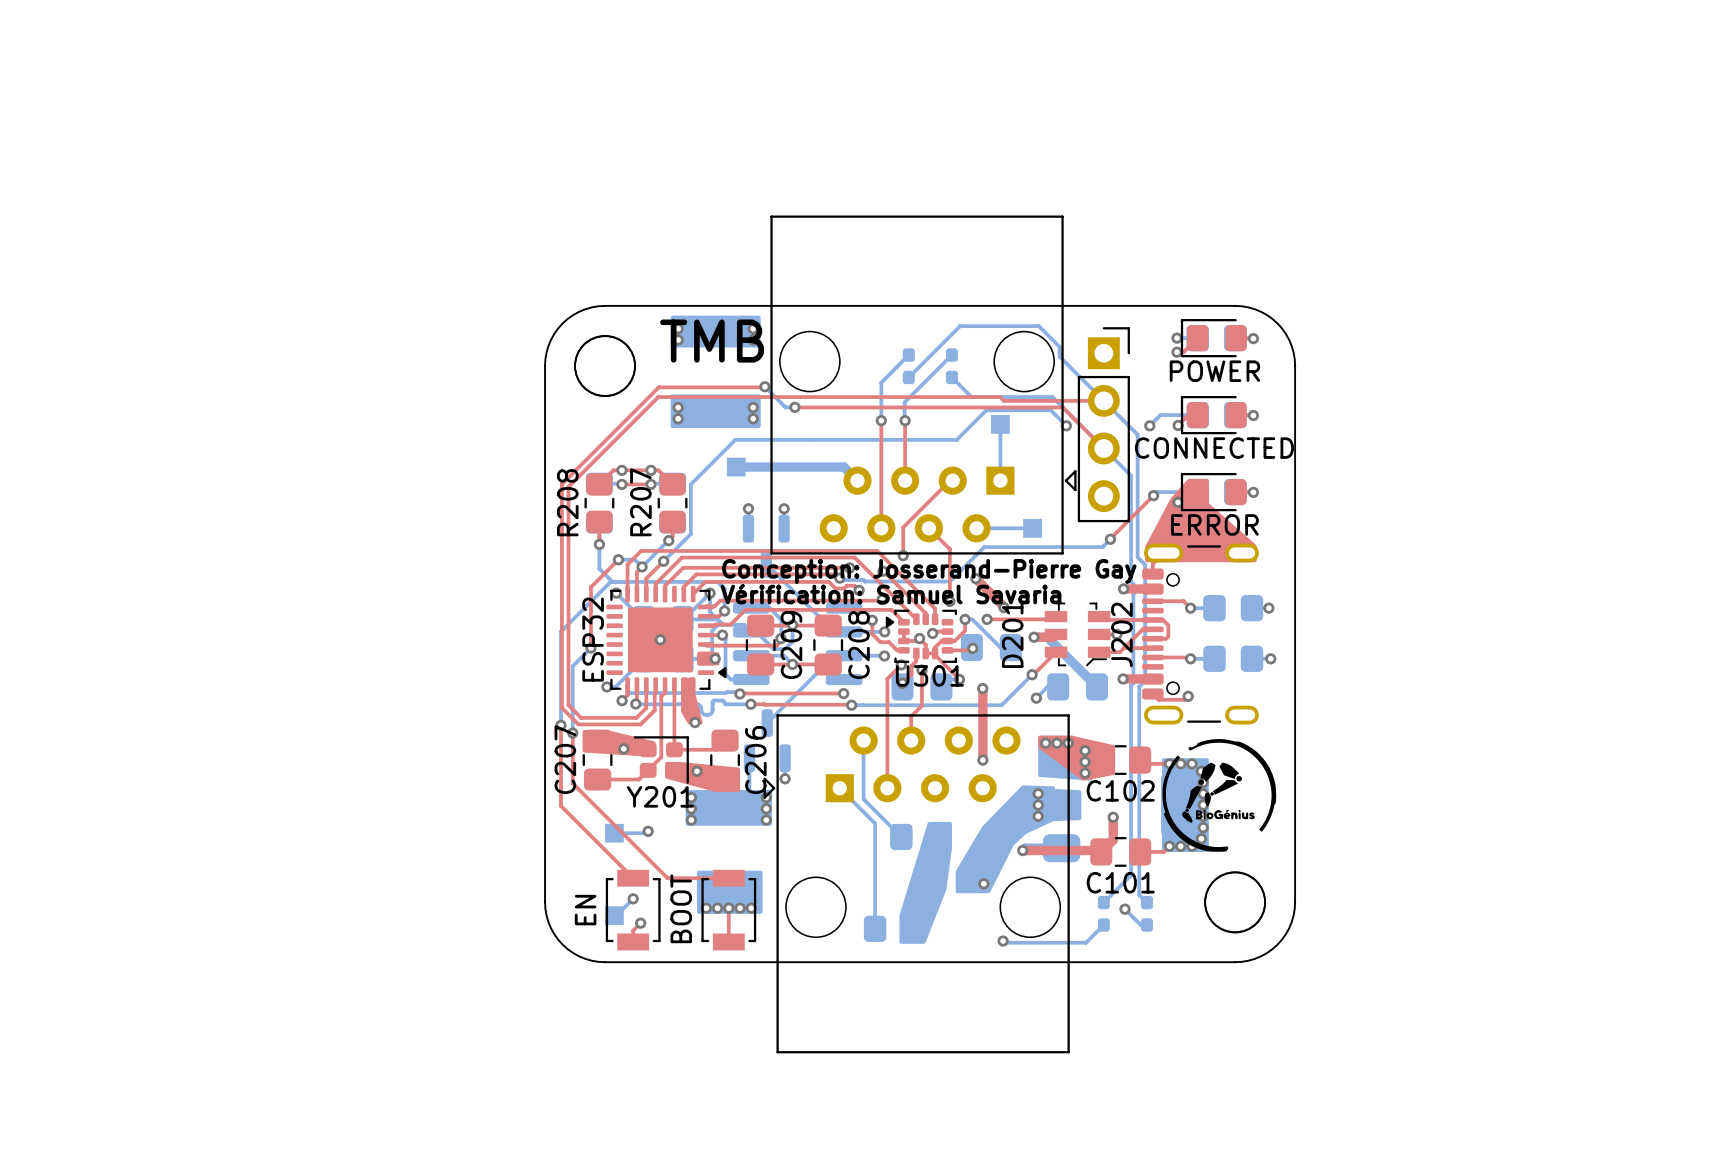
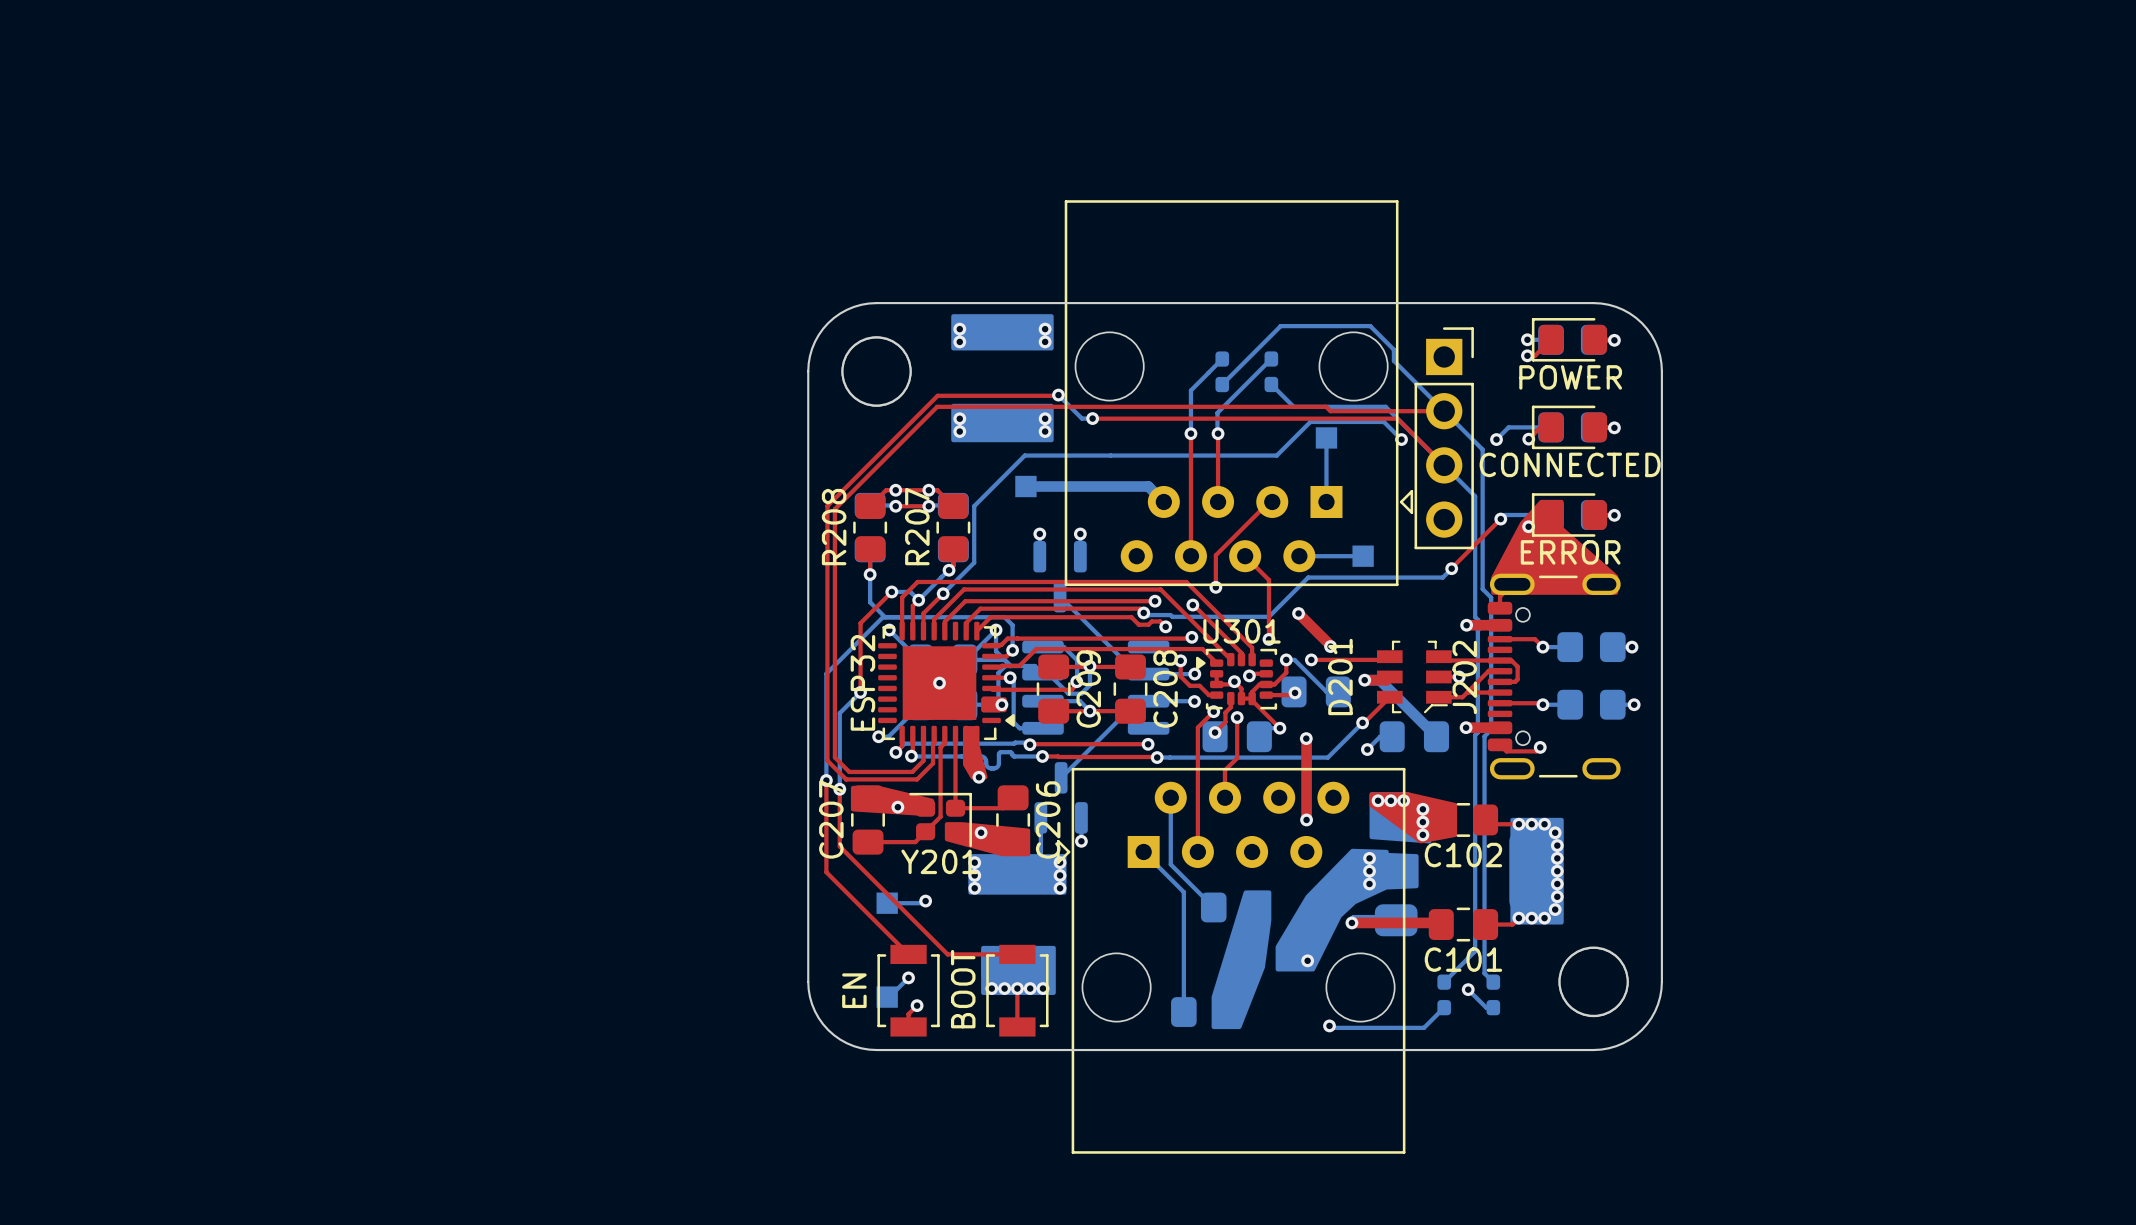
text: TMB (712, 341) -> none
text: Conception: Josserand-Pierre Gay (929, 571) -> none
text: Vérification: Samuel Savaria (890, 594) -> none
U301 name position: U301 (929, 675) -> U301 (1241, 631)
drawing: [1162, 739, 1277, 852] -> none
top track: (1113, 817) (1113, 839) (1101, 851) -> none
via: (1113, 817) -> none

